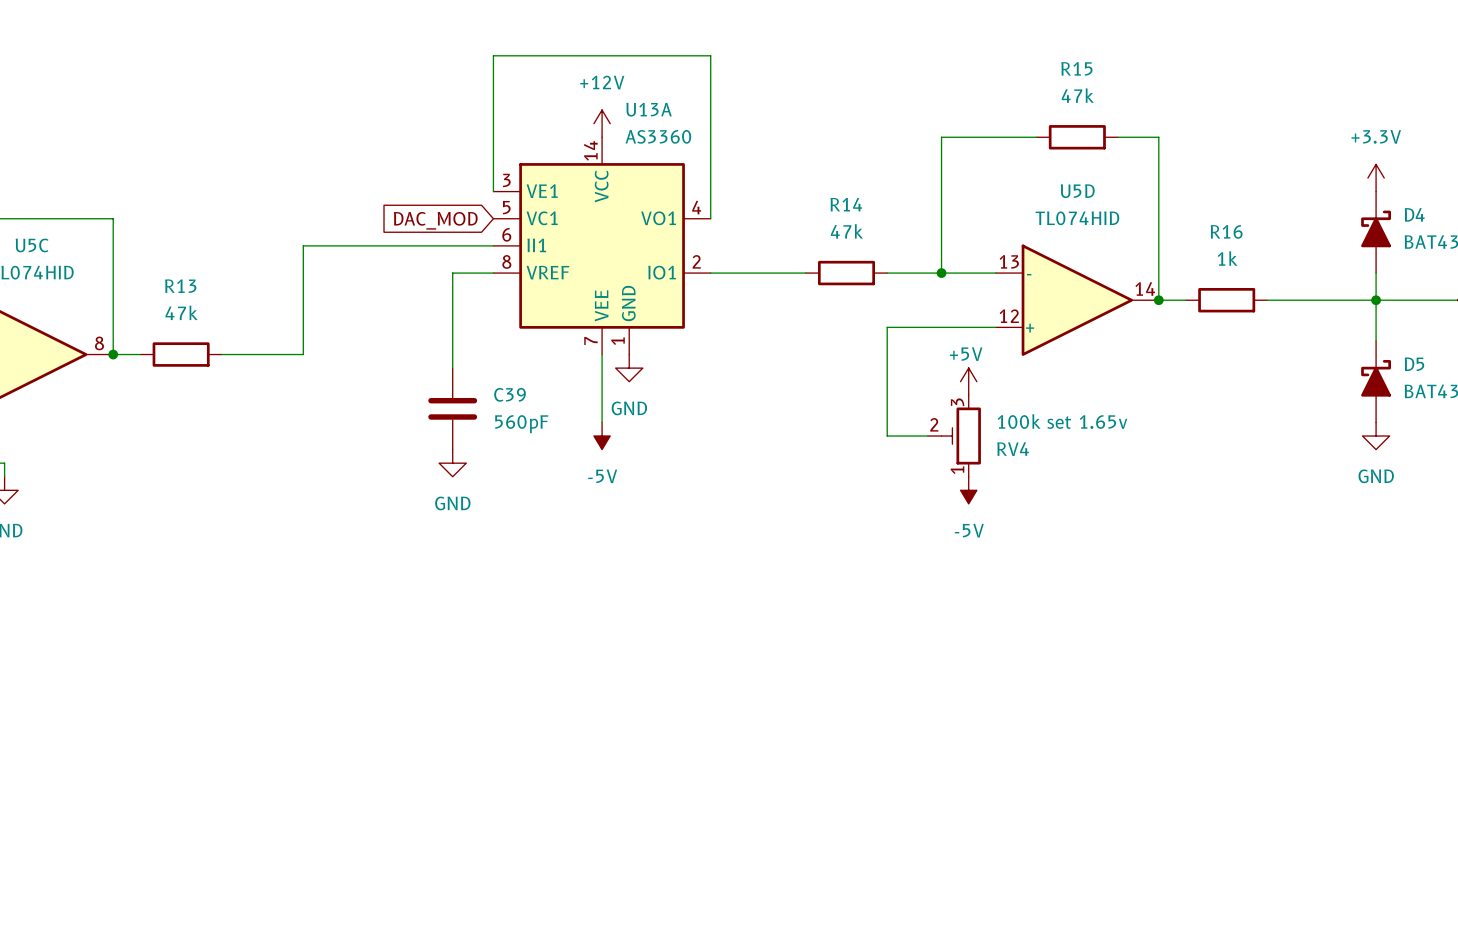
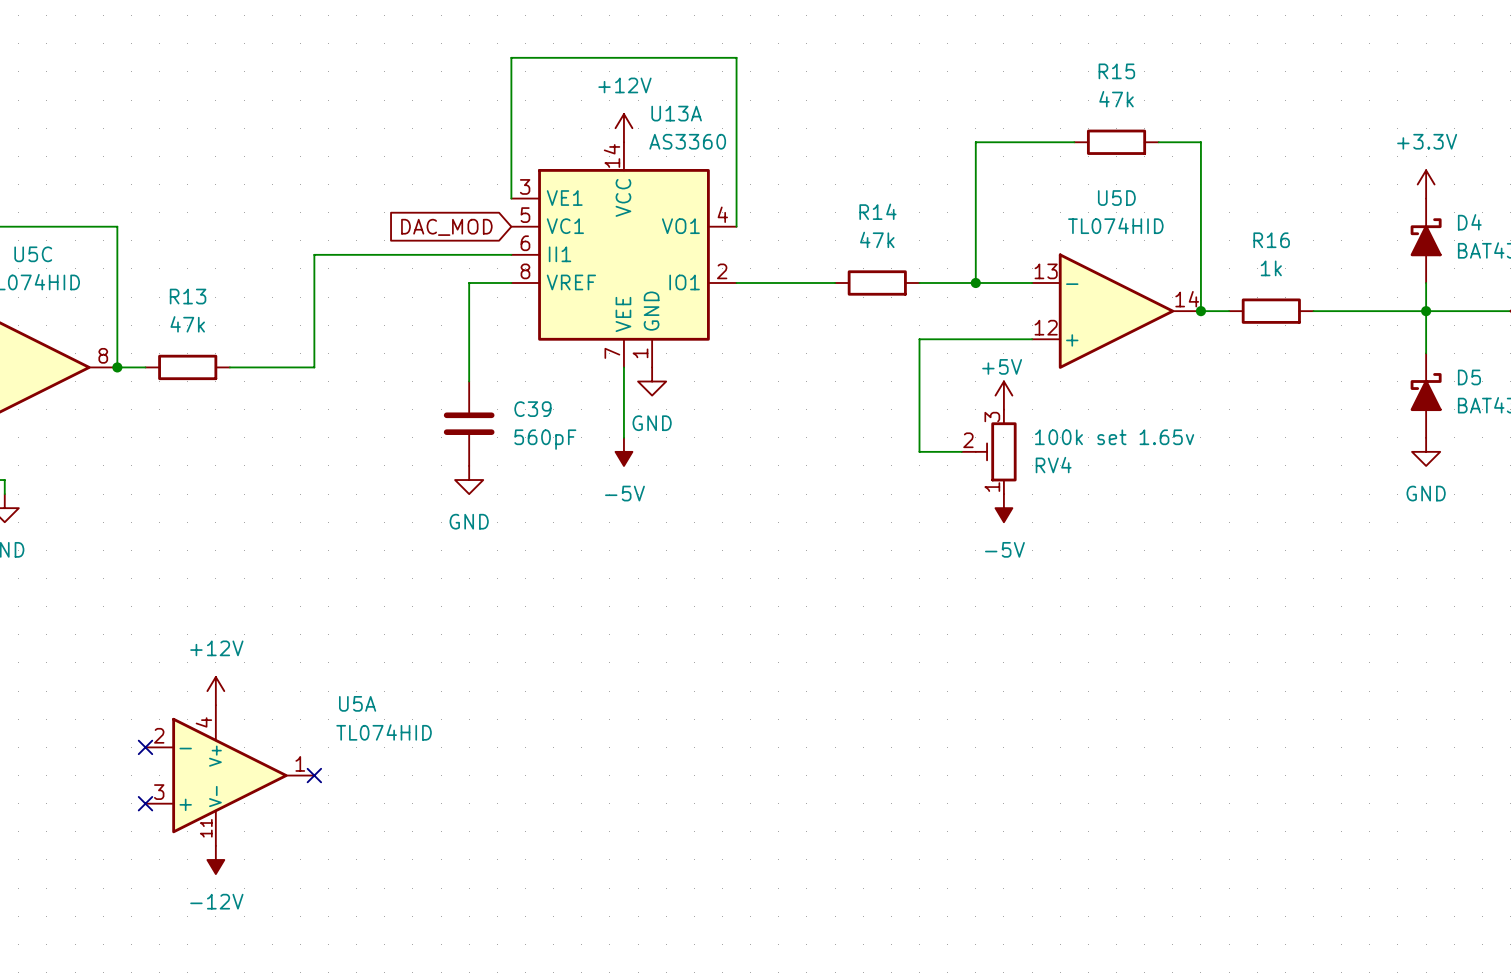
power symbol: none -> +12V (215, 691)
no-connect mark: none -> (145, 747)
U5A: none -> TL074HID (229, 775)
no-connect mark: none -> (314, 775)
no-connect mark: none -> (145, 803)
power symbol: none -> -12V (215, 859)

